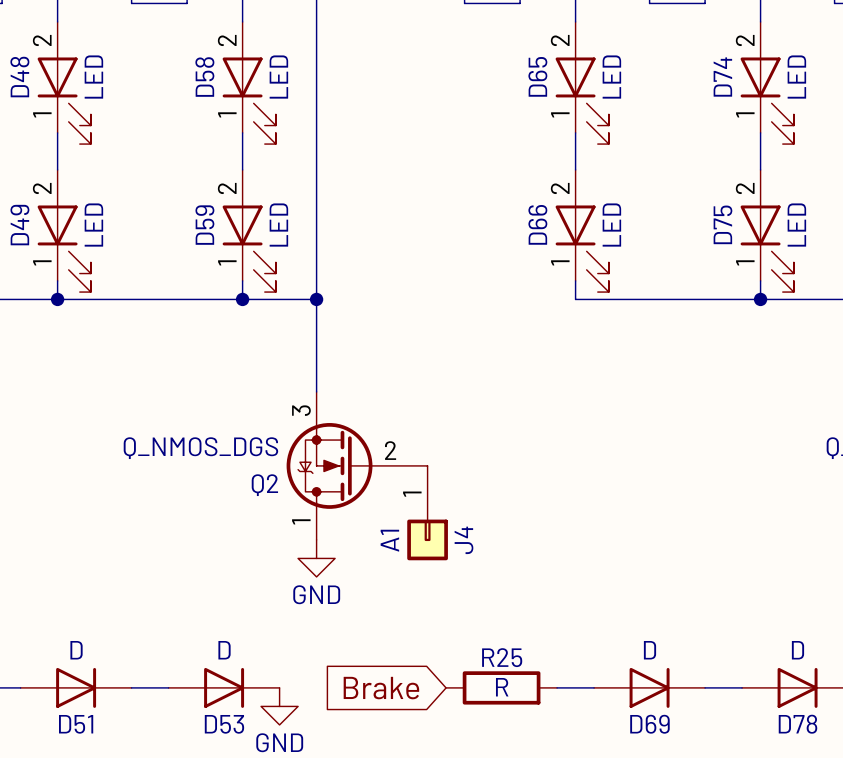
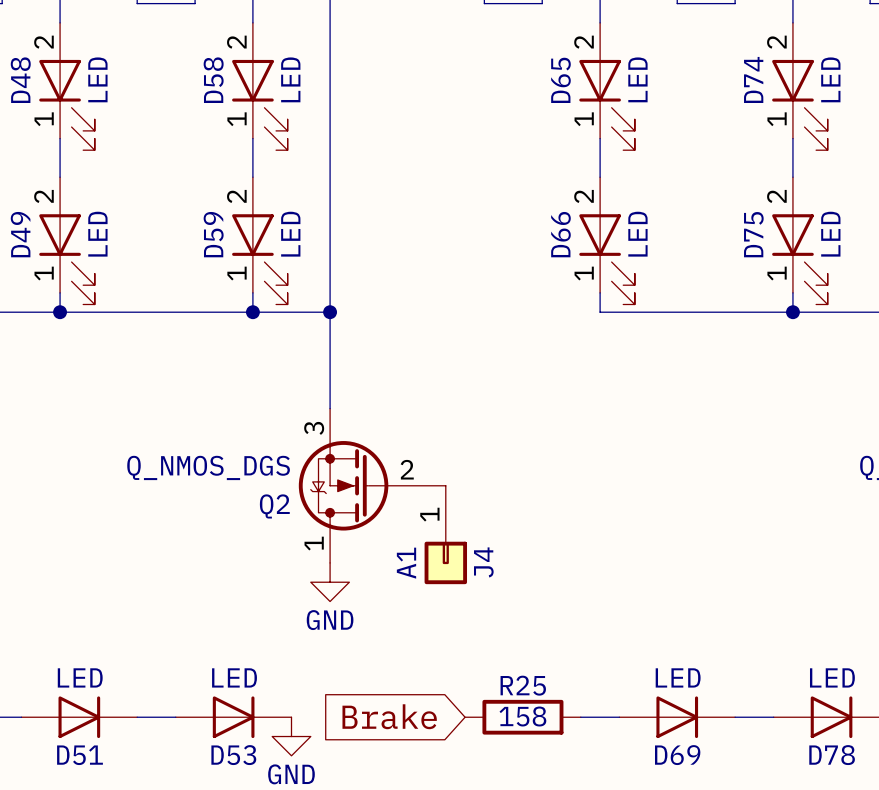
D51 value: D (76, 650) -> LED (80, 677)
D53 value: D (224, 650) -> LED (234, 677)
D69 value: D (649, 650) -> LED (678, 677)
D78 value: D (797, 650) -> LED (832, 677)
R25 value: R (502, 687) -> 158 (522, 716)

